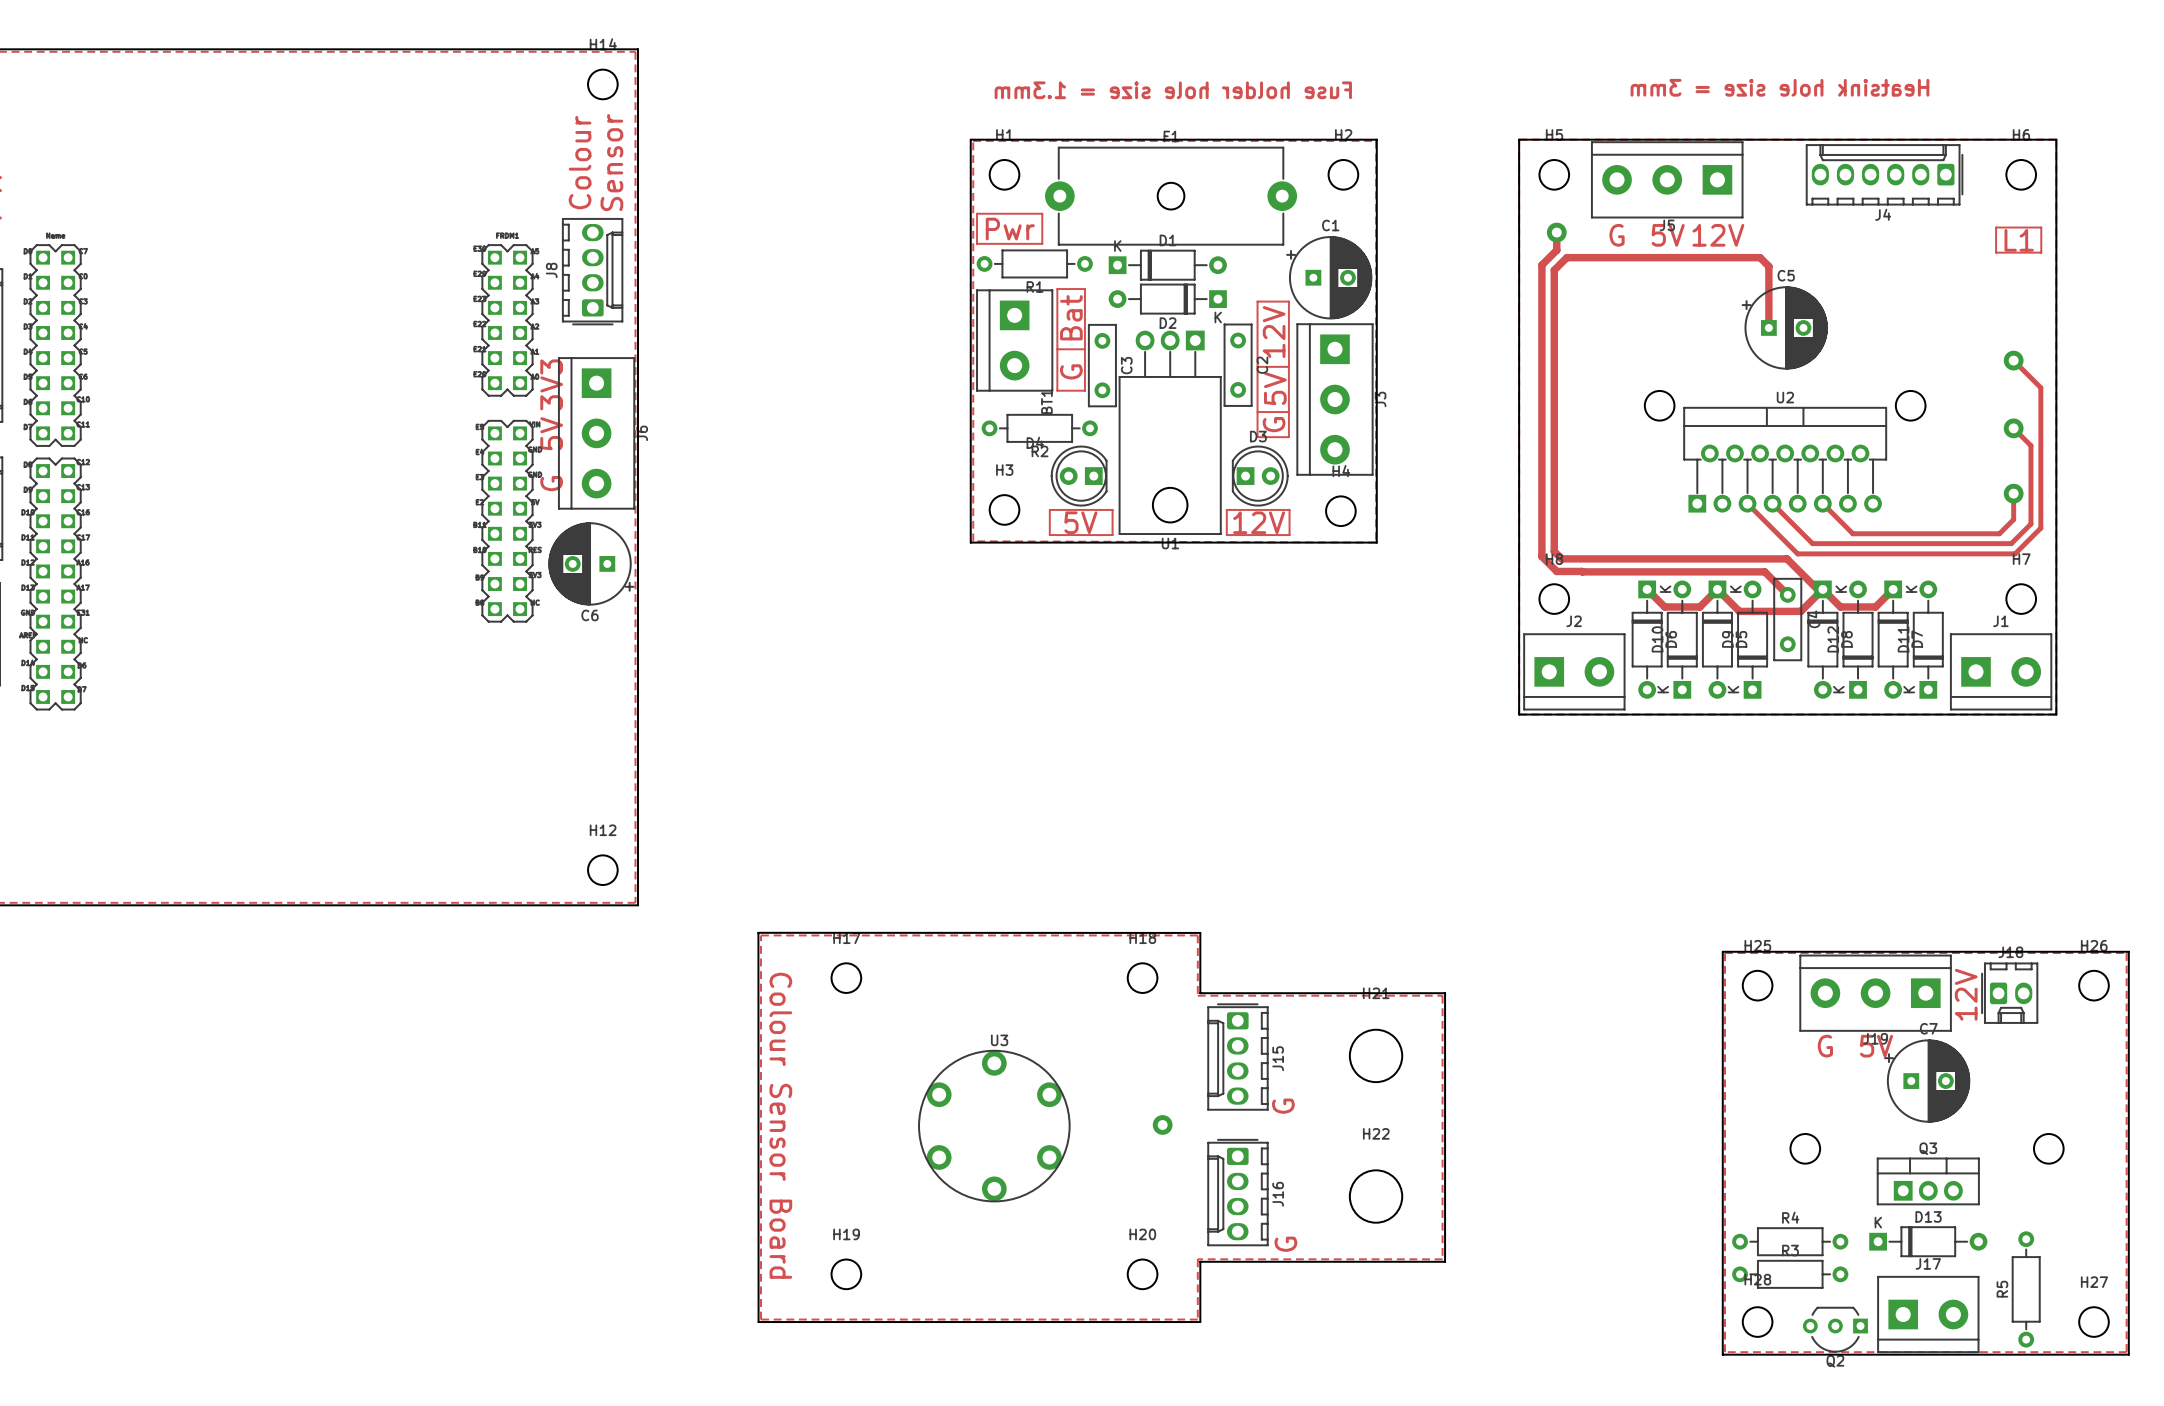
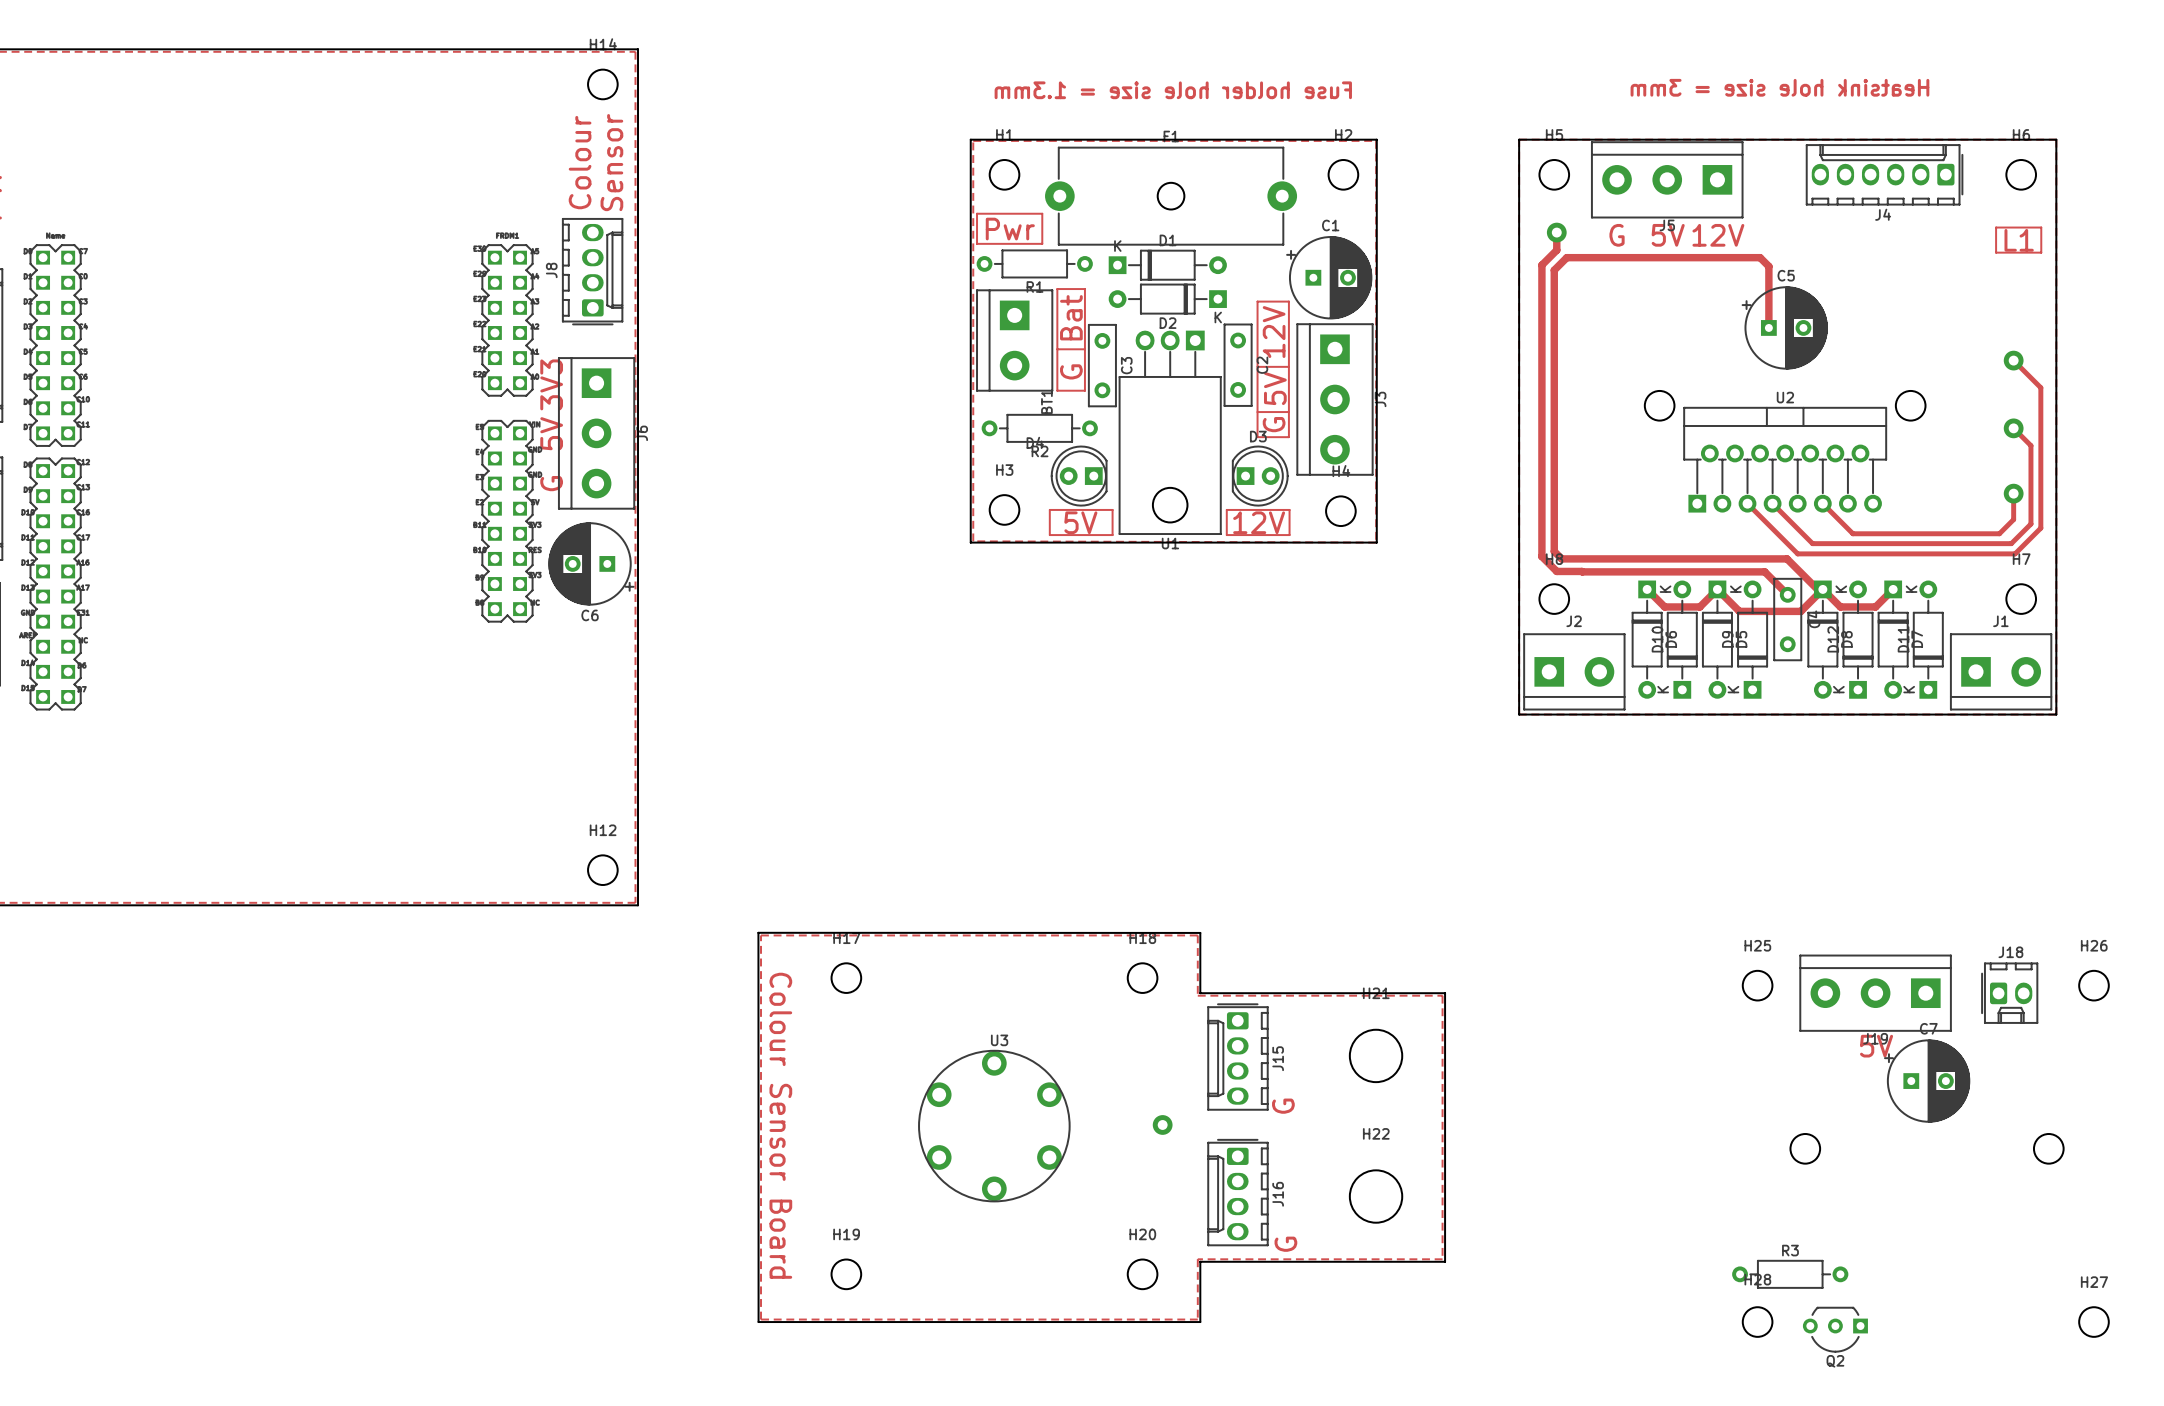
board edge: (1722, 951) (2128, 951) (2128, 1354) (1722, 1354) (1722, 951) -> none
zone outline: (1724, 953) (2126, 953) (2126, 1352) (1724, 1352) (1724, 953) -> none
text: 12V (1966, 994) -> none
text: G (1825, 1046) -> none
Q3: (1928, 1181) -> none
R4: (1790, 1241) -> none
D13: (1928, 1241) -> none
R5: (2026, 1289) -> none
J17: (1928, 1314) -> none

